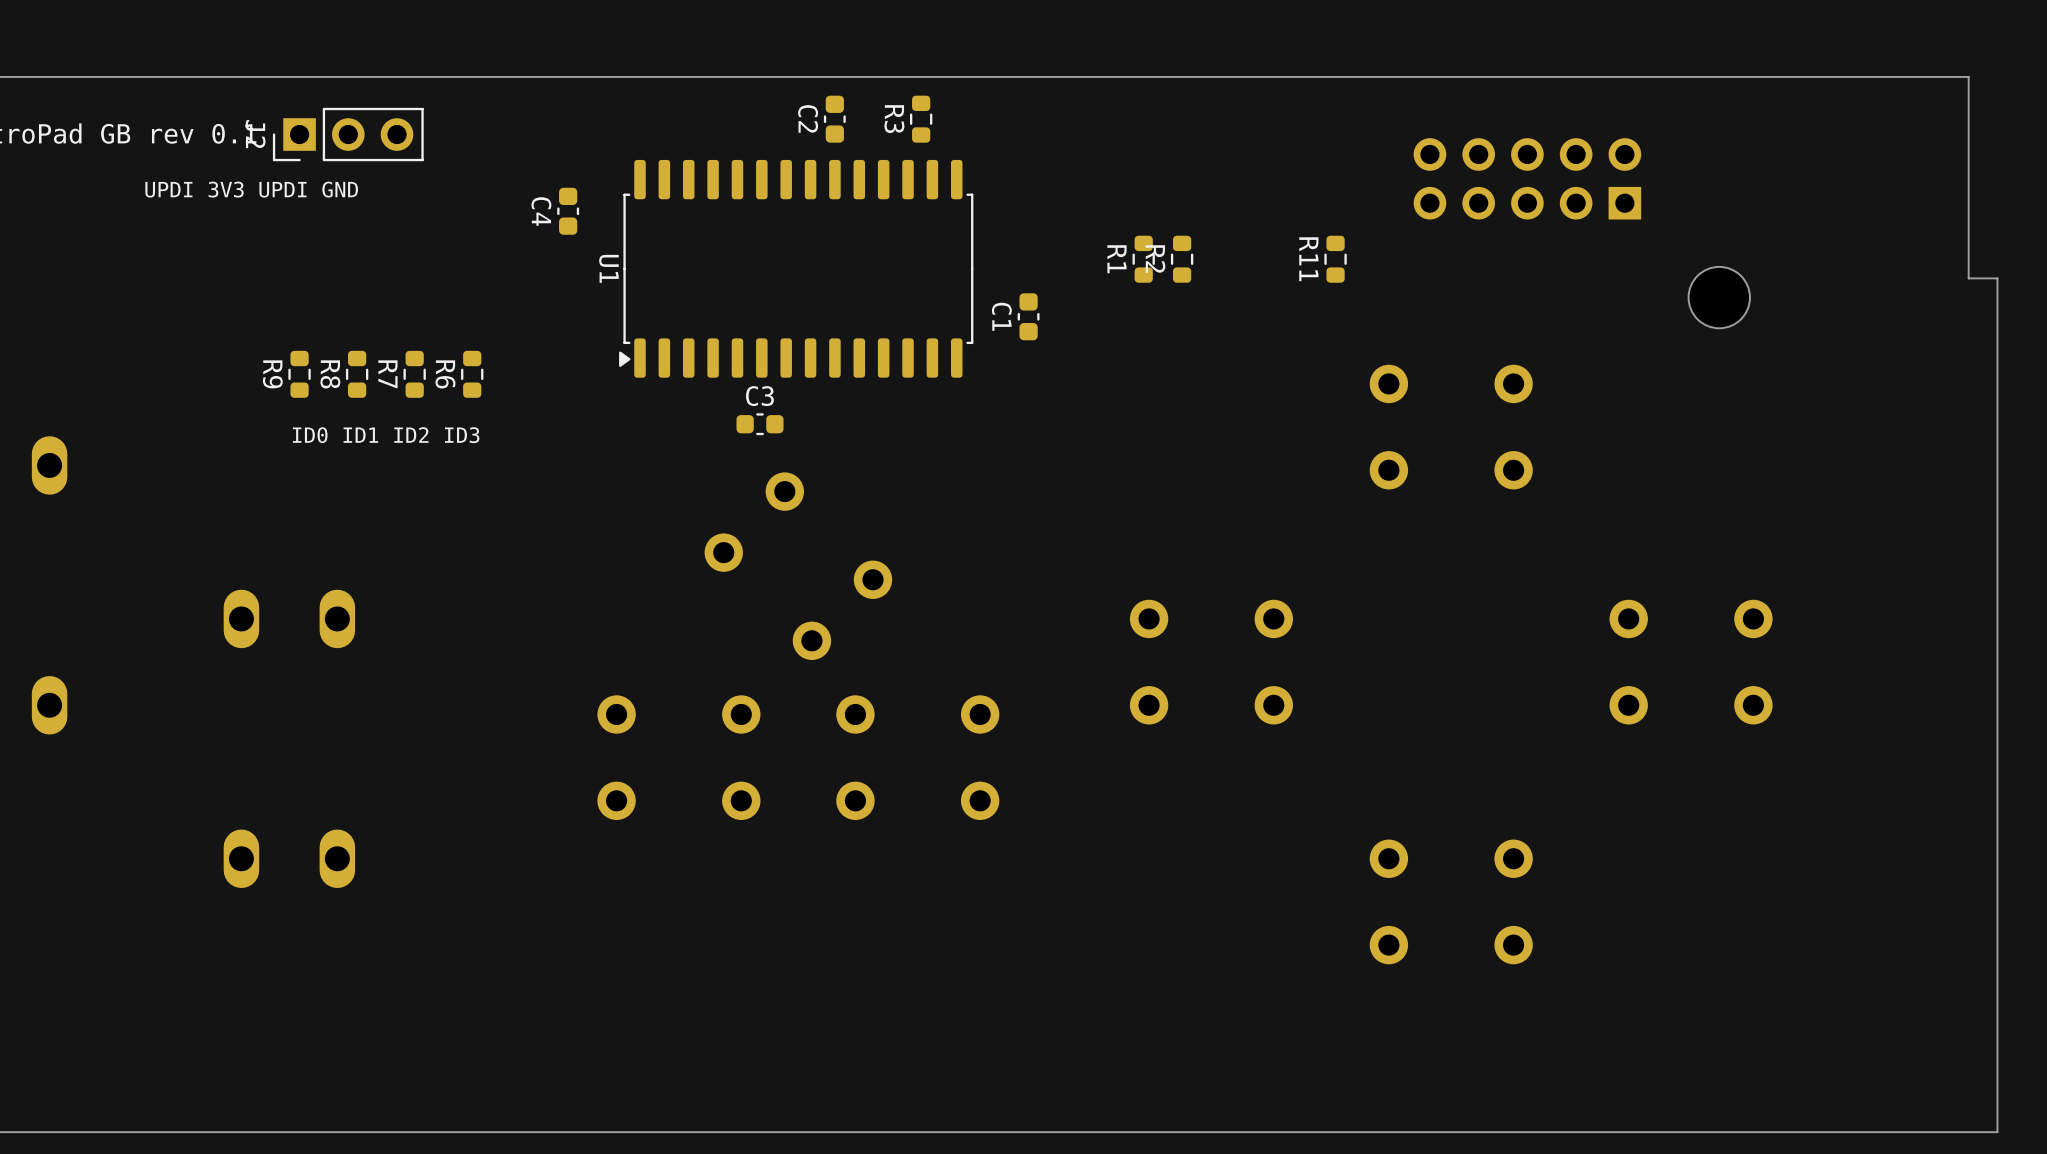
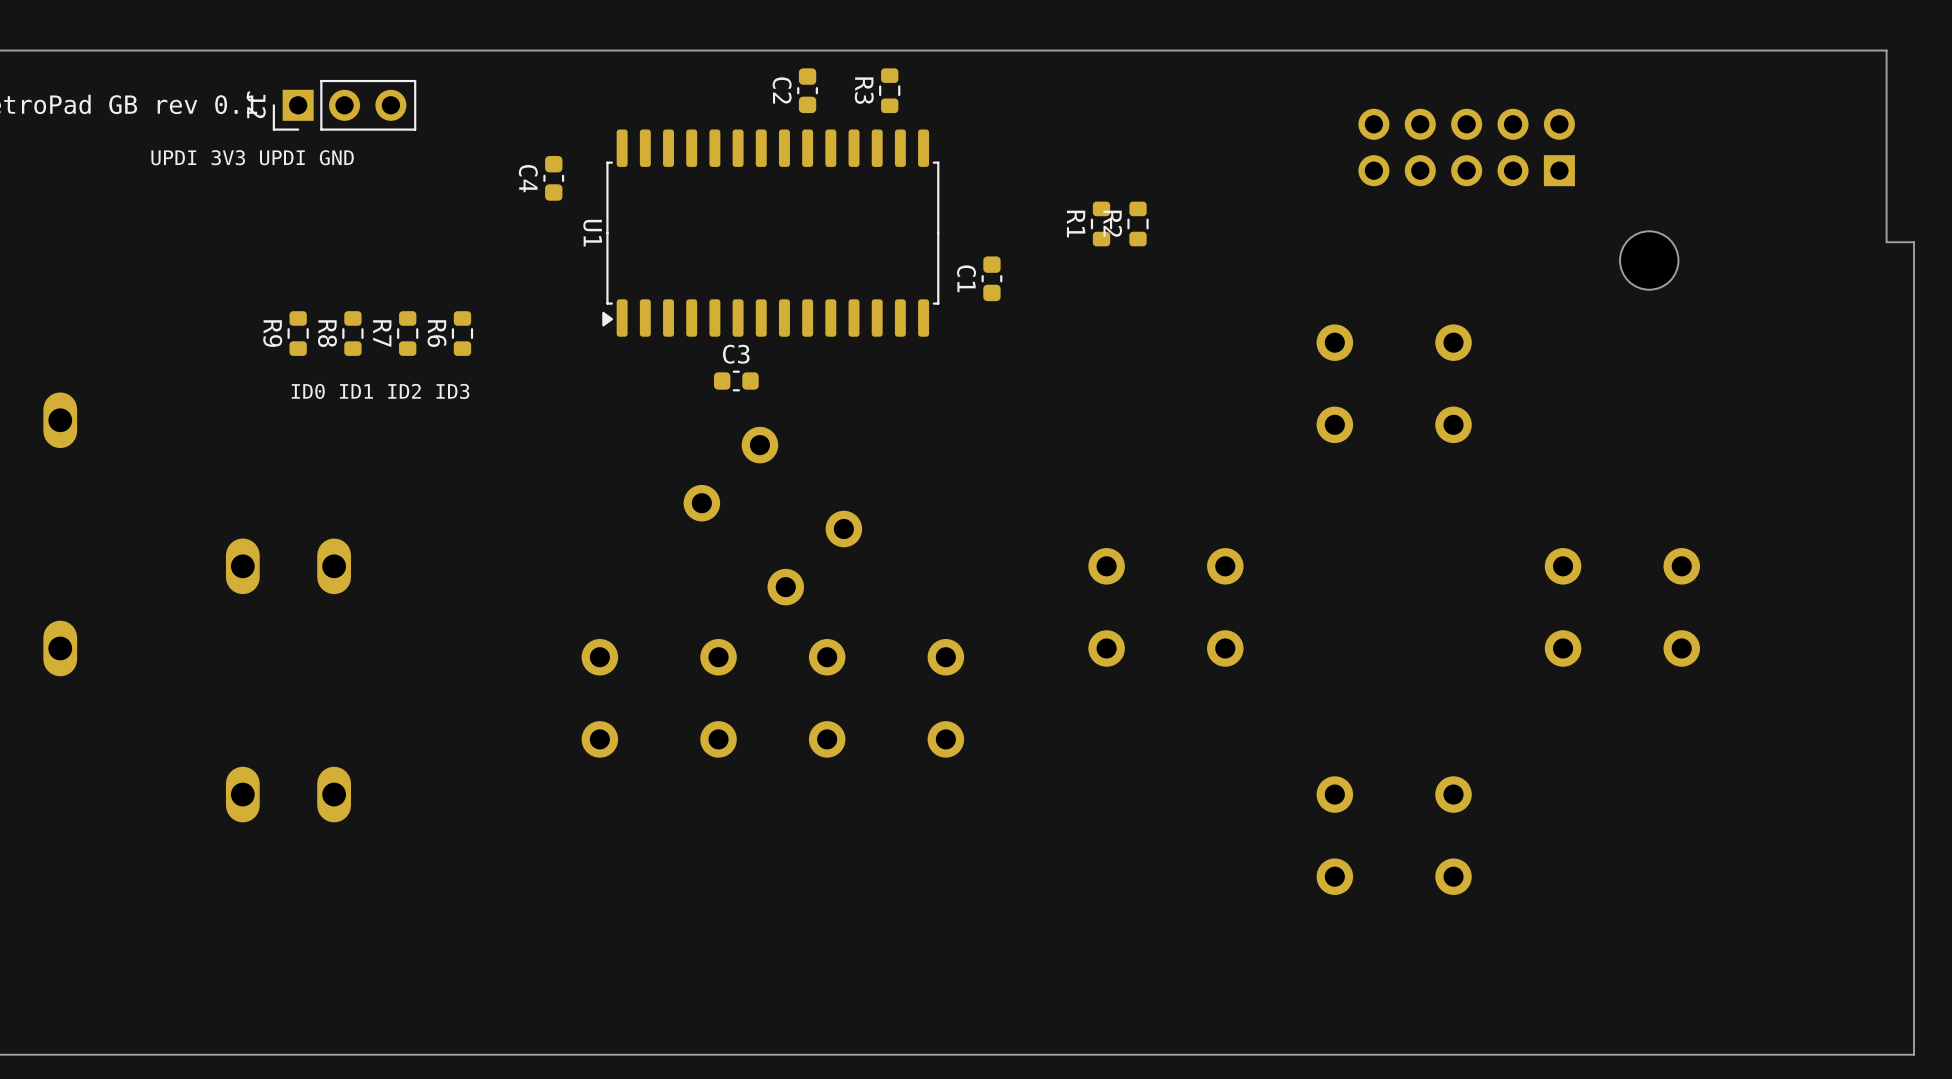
R11: (1335, 259) -> none

